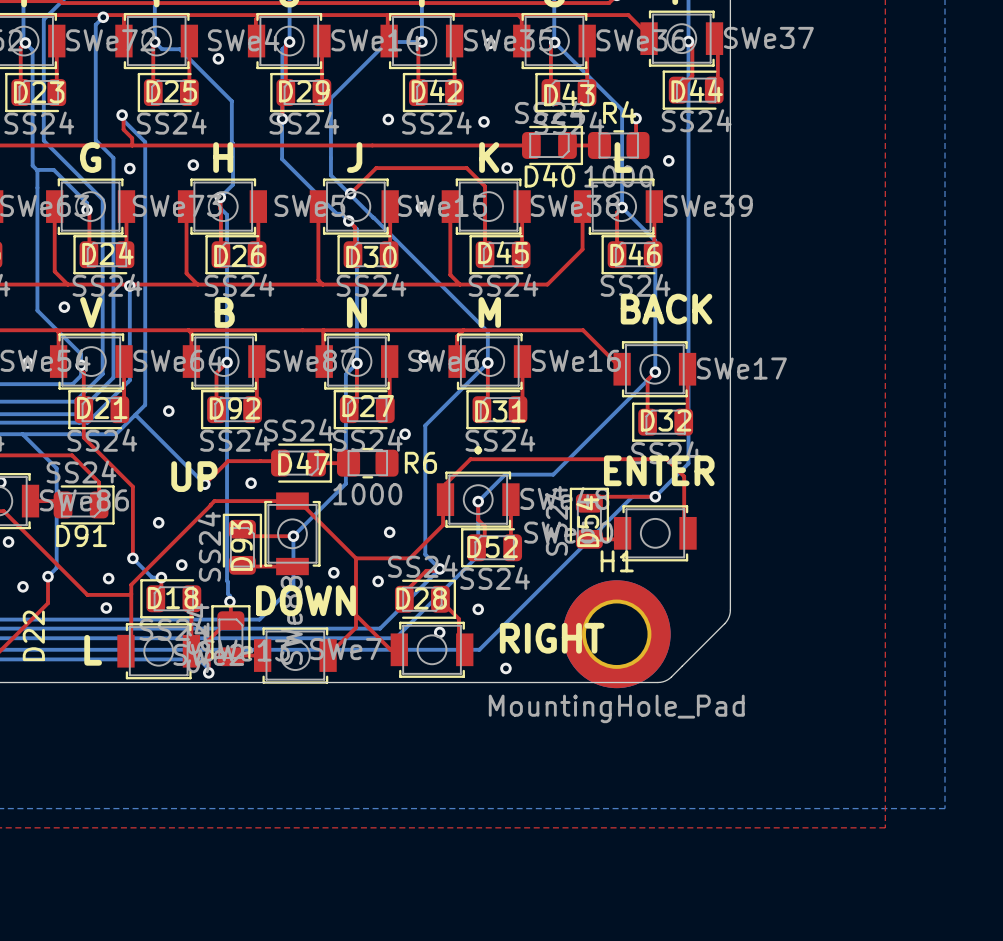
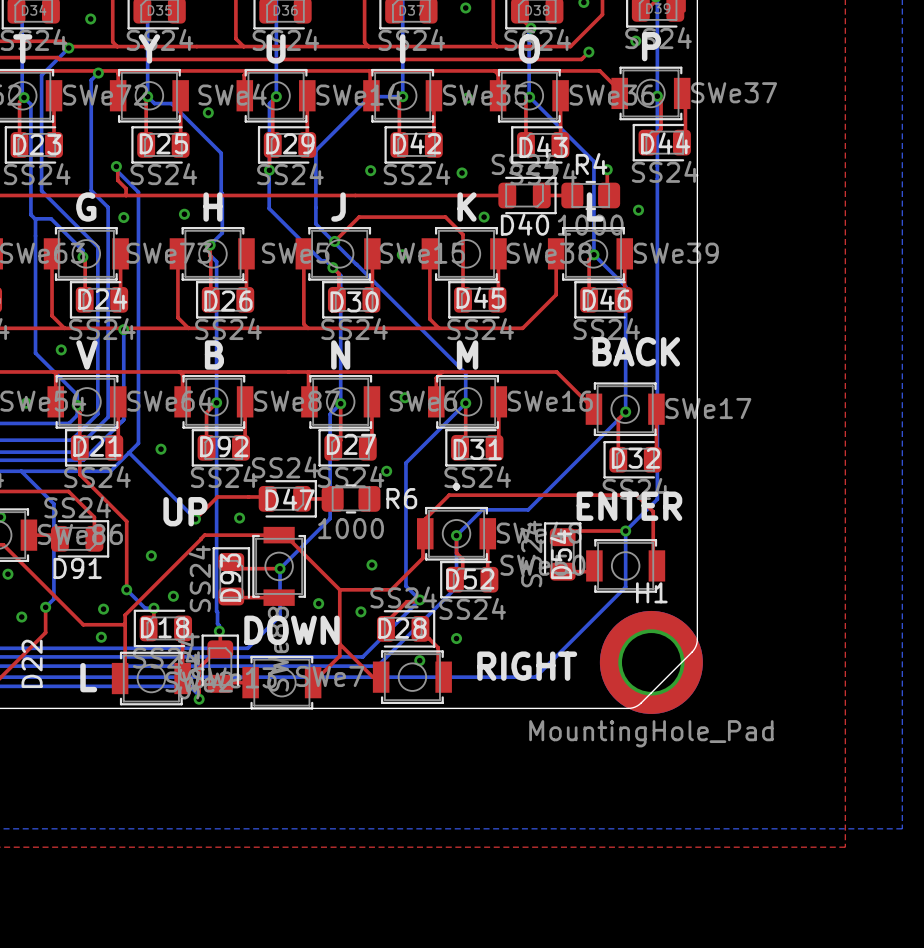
bottom track: (655, 496) (632, 496) (479, 649) -> (625, 531) (625, 587) (535, 677) (457, 677)
H1 position: (616, 634) -> (651, 662)
via: (505, 668) -> none

